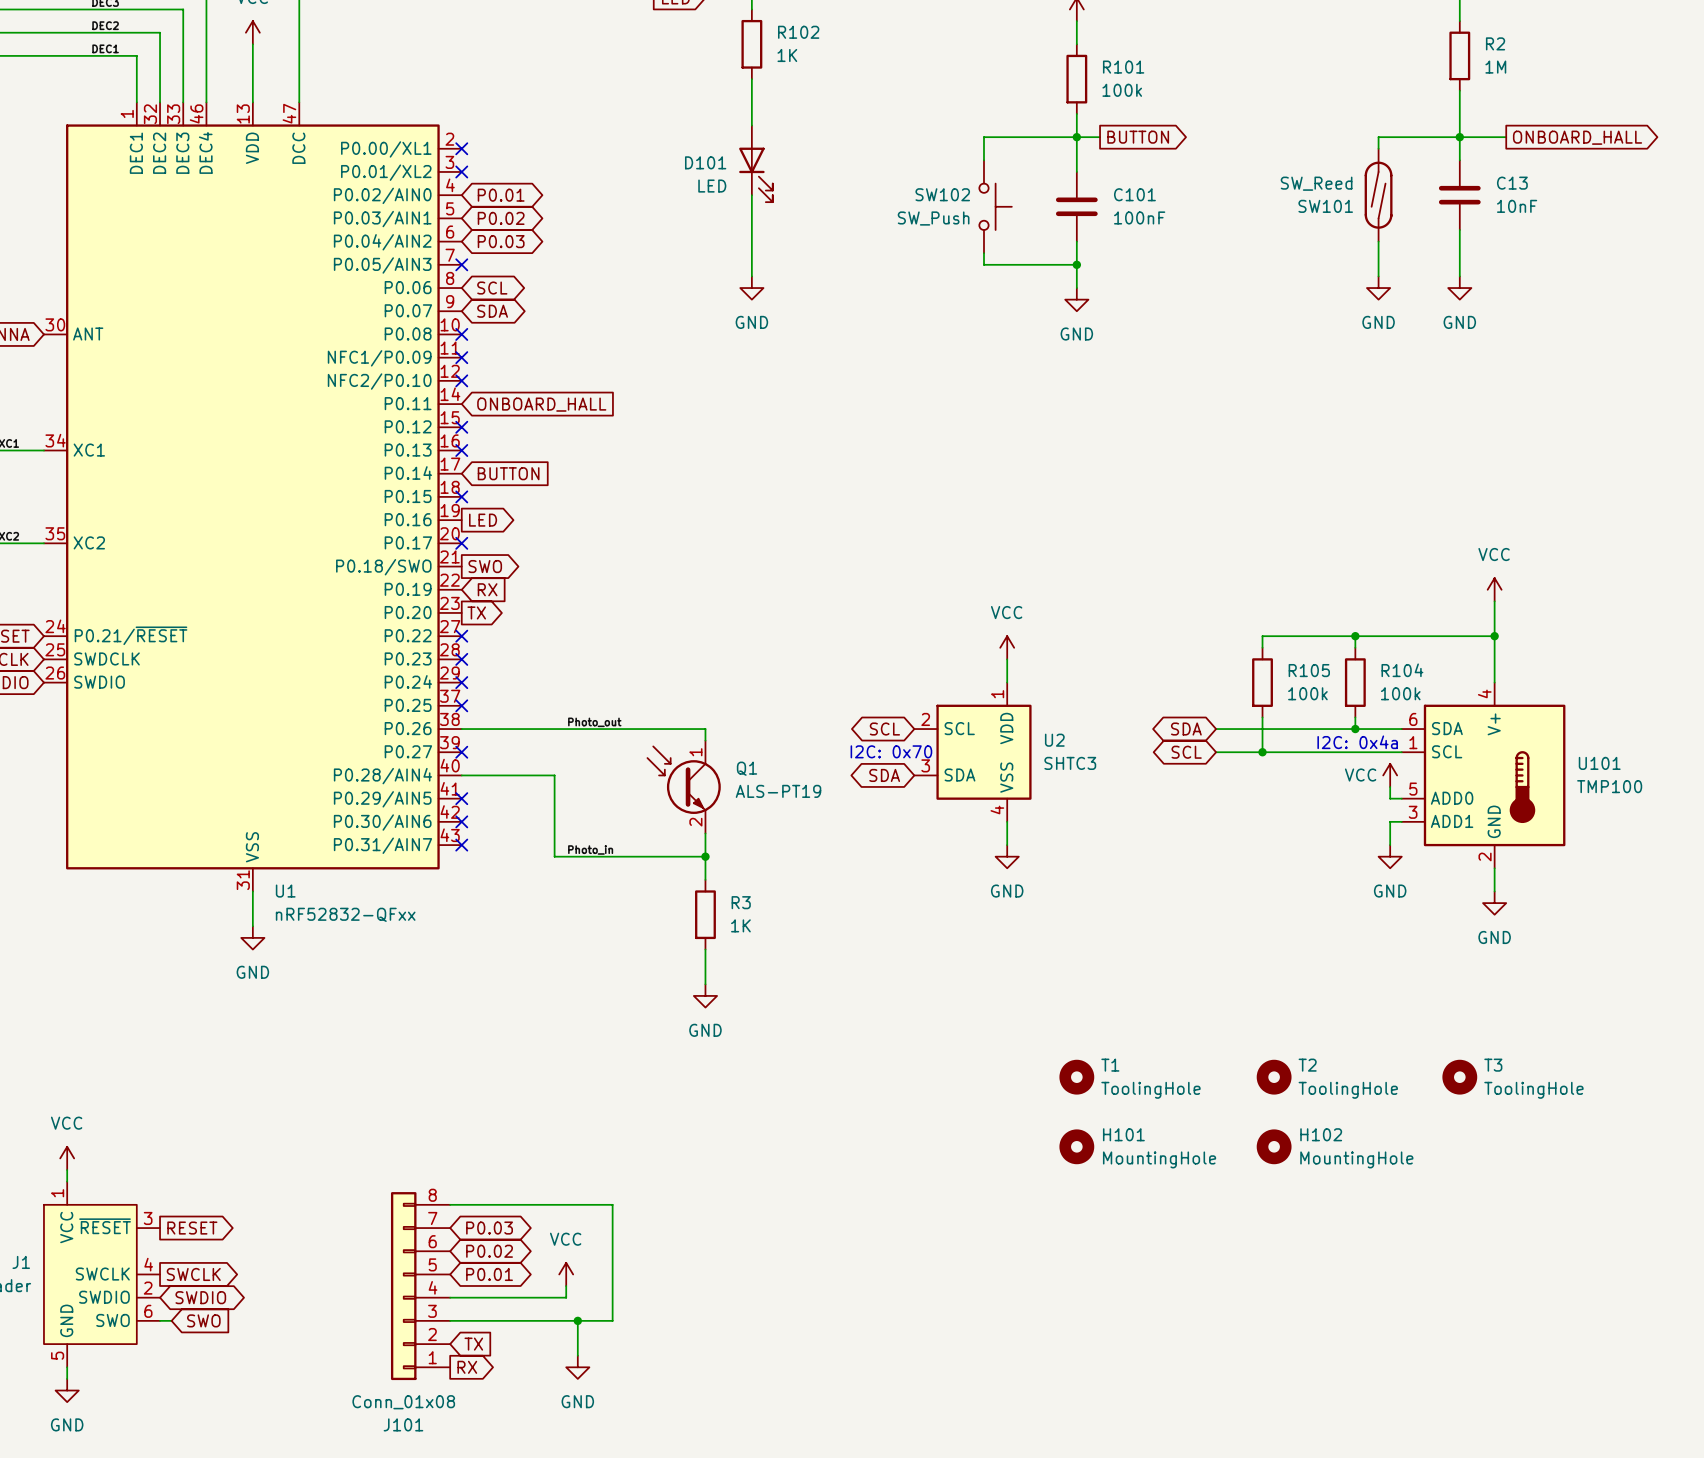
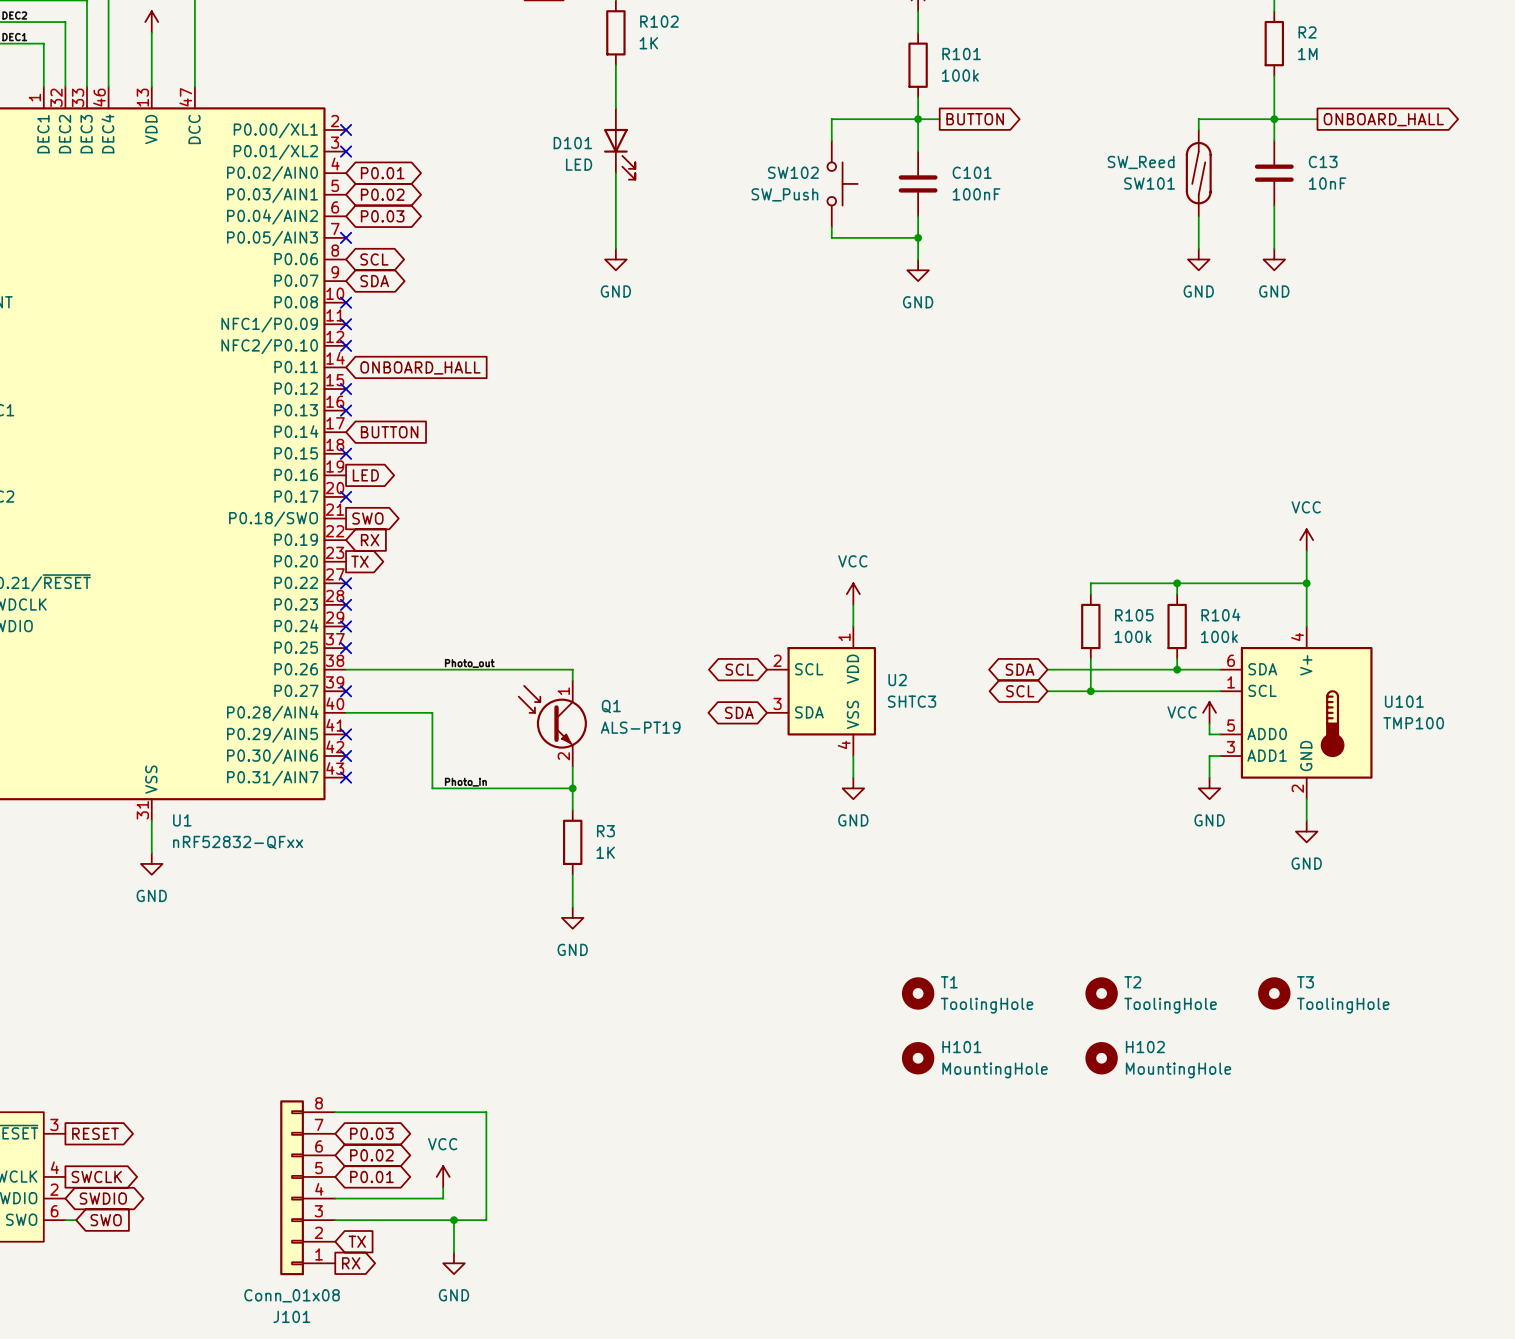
text: I2C: 0x4a (1357, 742) -> none
text: I2C: 0x70 (891, 751) -> none

